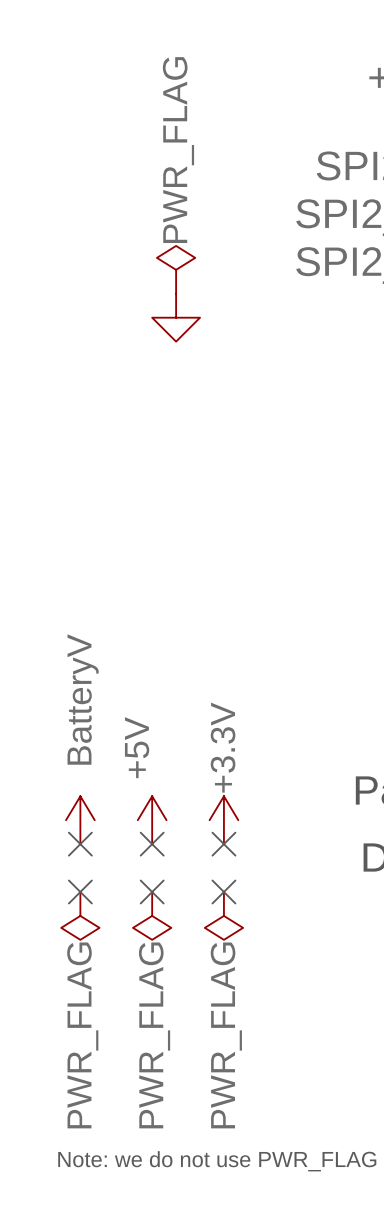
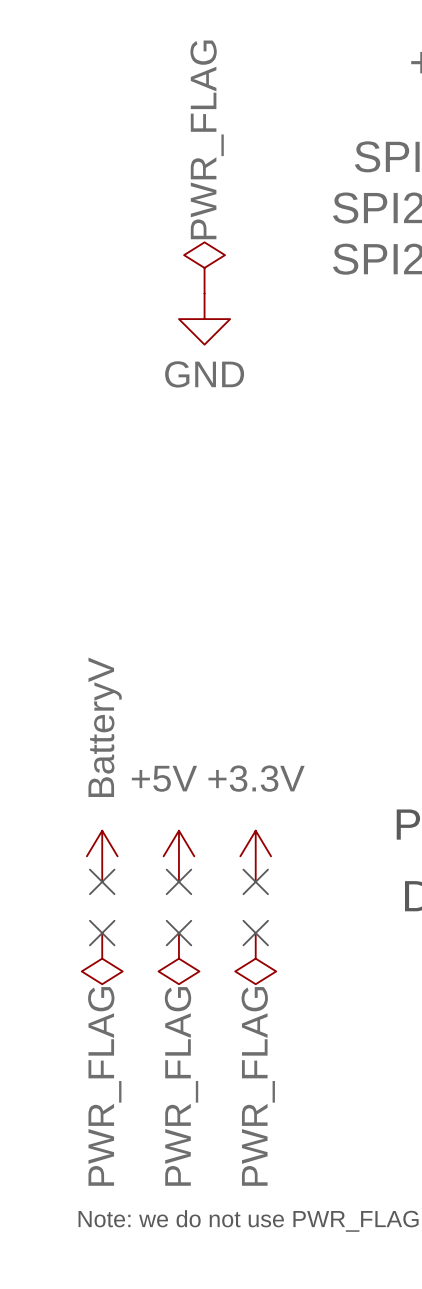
power symbol text: none -> GND (204, 374)
power symbol text rotation: 0° (137, 747) -> 90° clockwise (164, 778)
power symbol text rotation: 0° (223, 747) -> 90° clockwise (256, 778)

